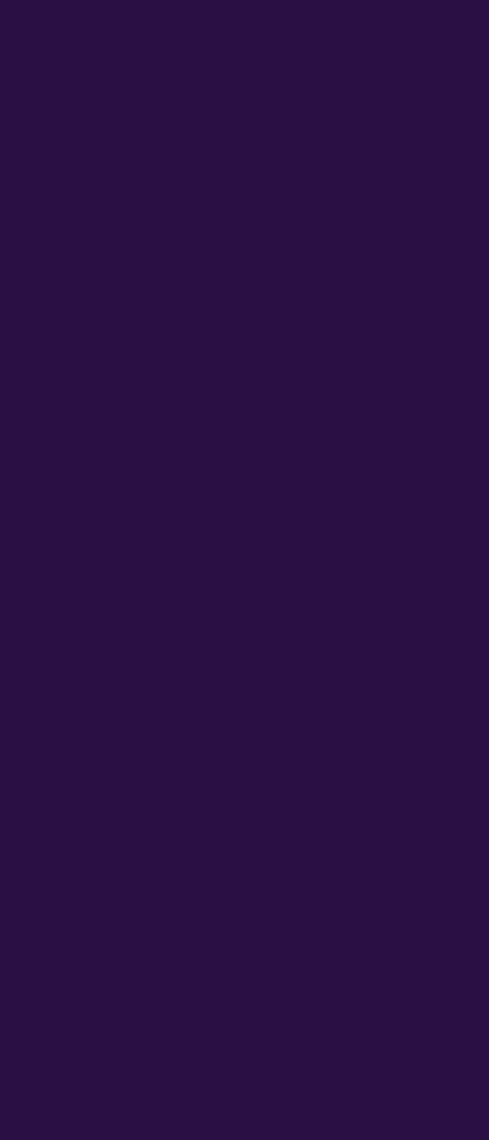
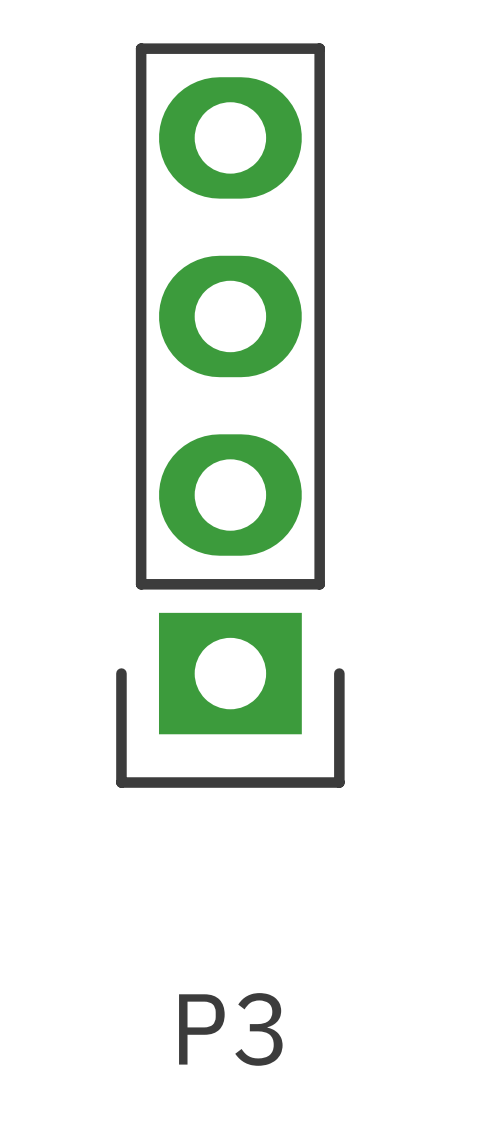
P3: none -> (230, 415)

